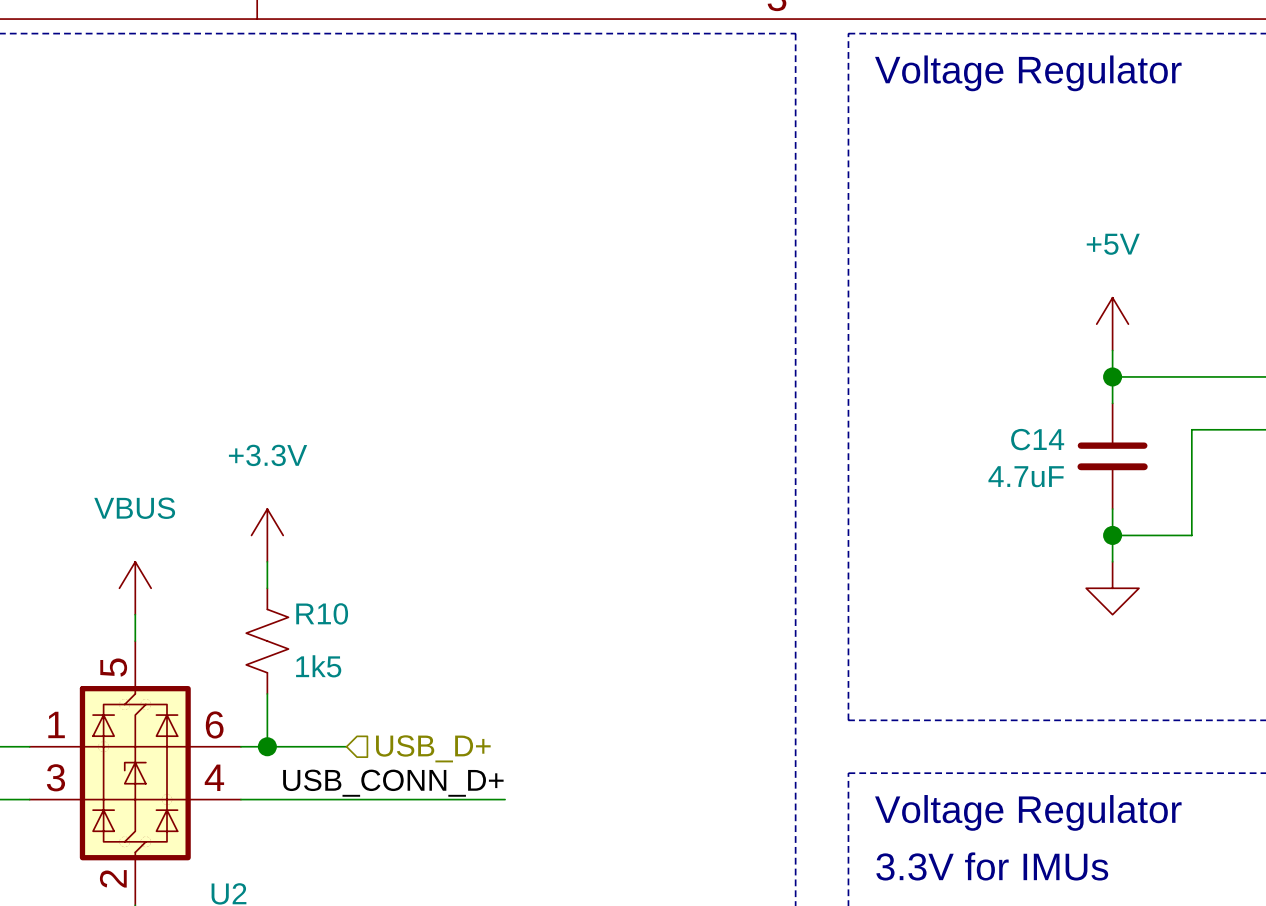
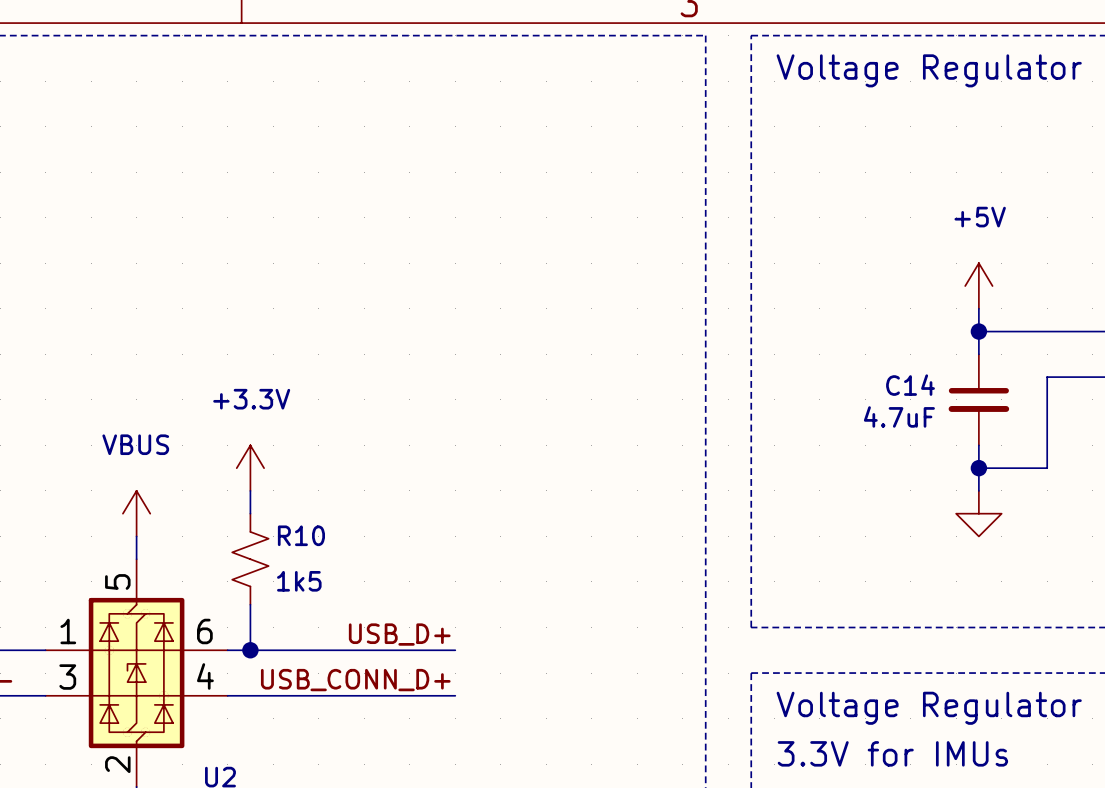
label: none -> USB_D+ (399, 634)
wire: none -> (318, 650) (455, 650)
hierarchical label: USB_D+ (433, 748) -> none

